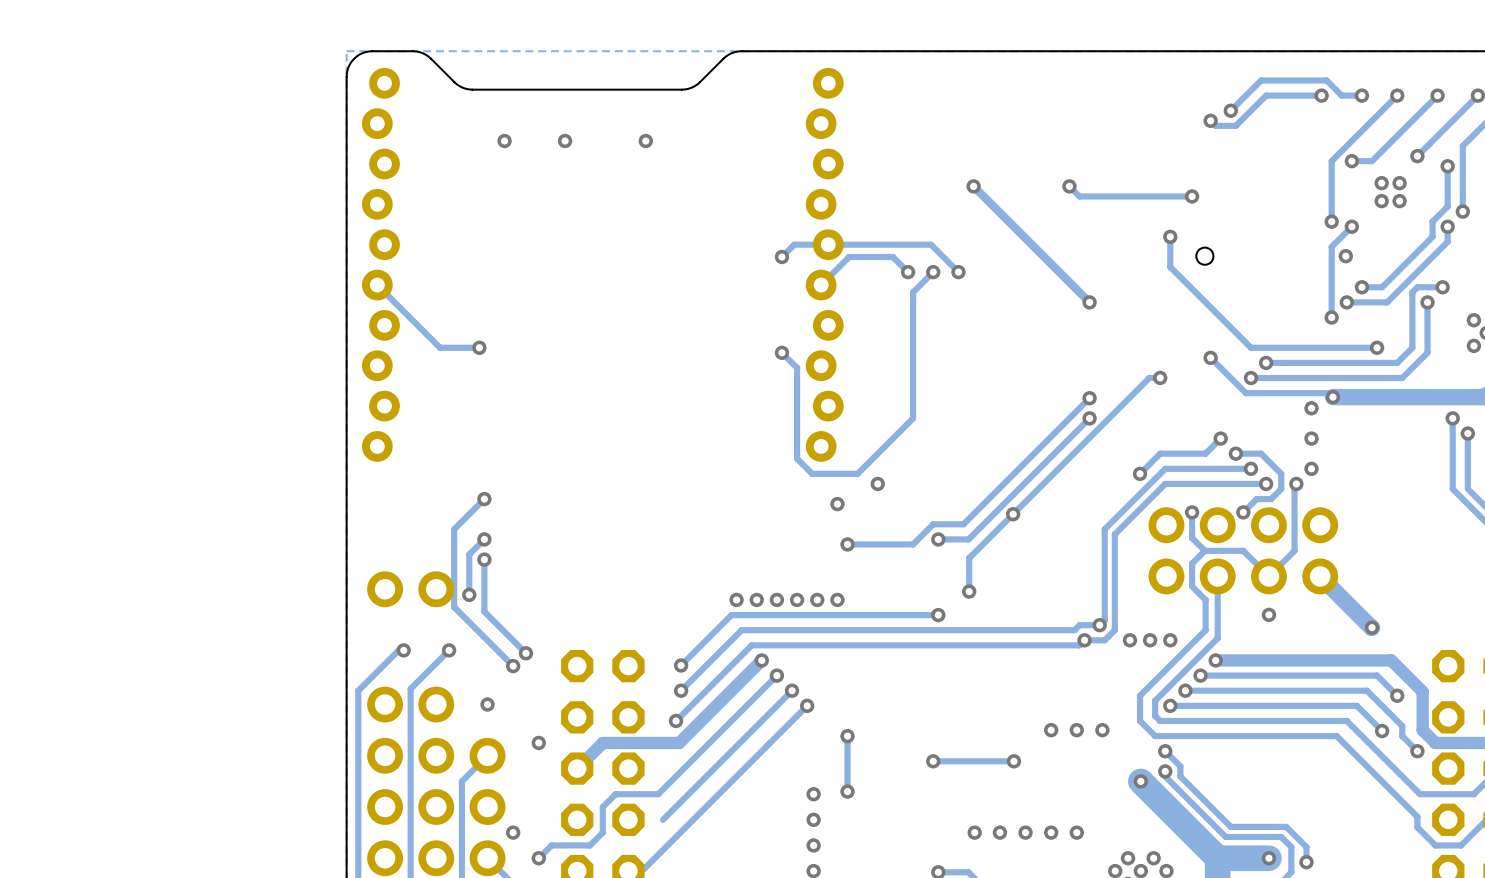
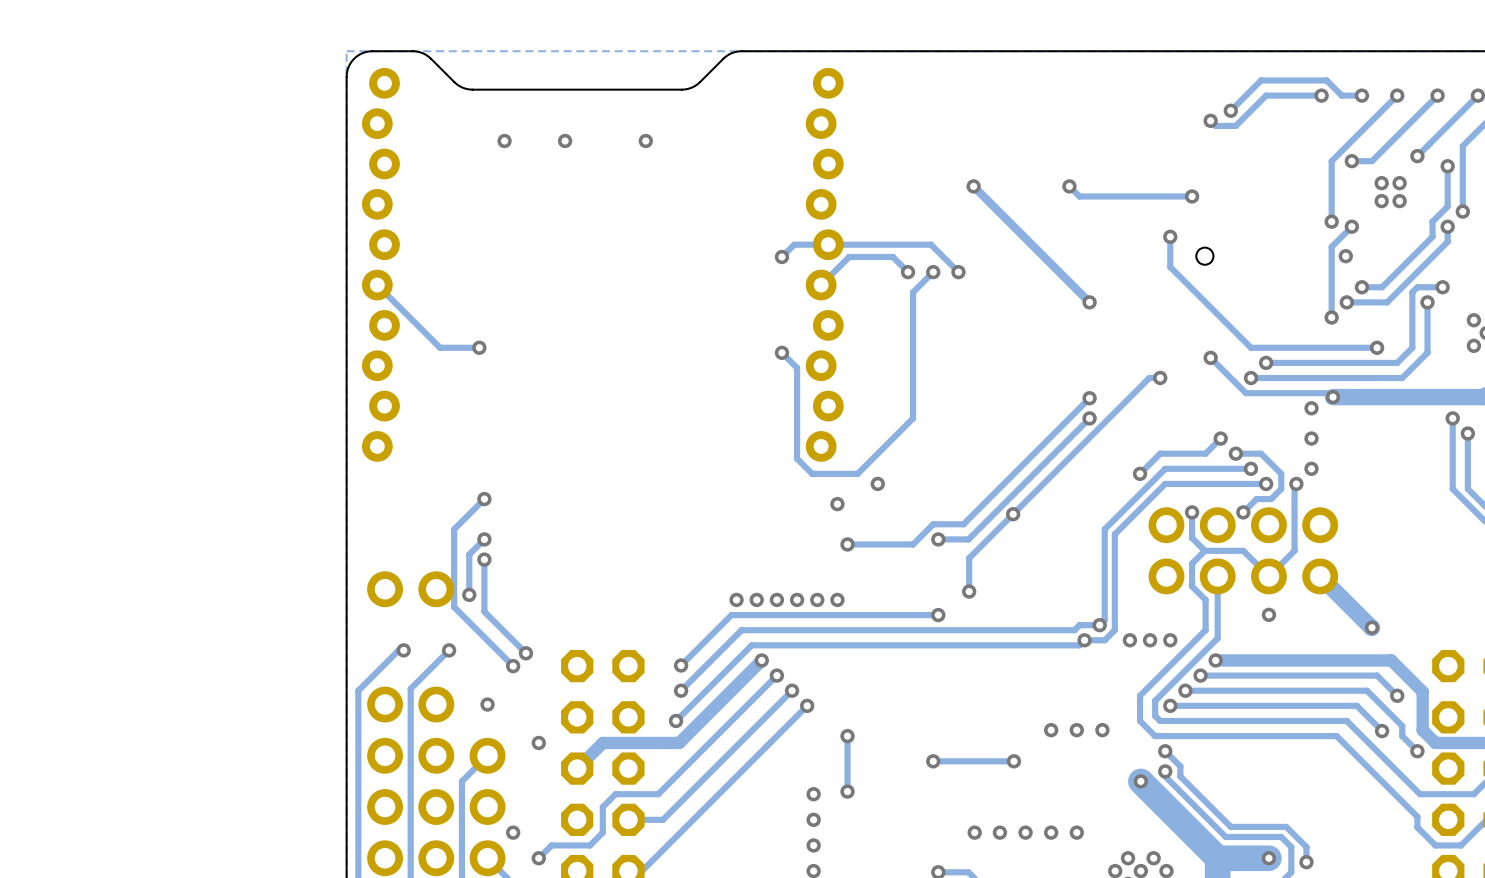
track: none -> (662, 819) (628, 819)

